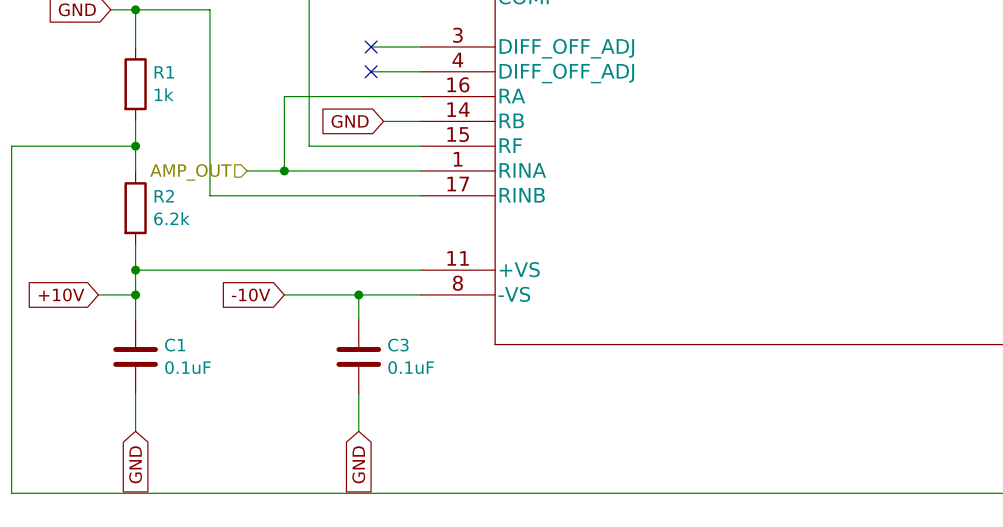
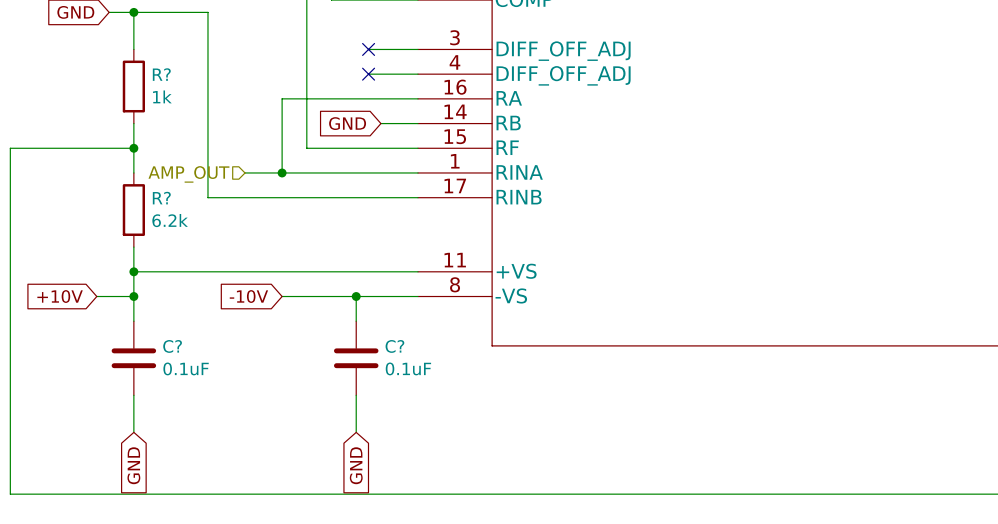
R1 name: R1 (164, 72) -> R? (161, 74)
R2 name: R2 (164, 196) -> R? (161, 198)
C1 name: C1 (175, 345) -> C? (172, 346)
C3 name: C3 (398, 345) -> C? (394, 346)

